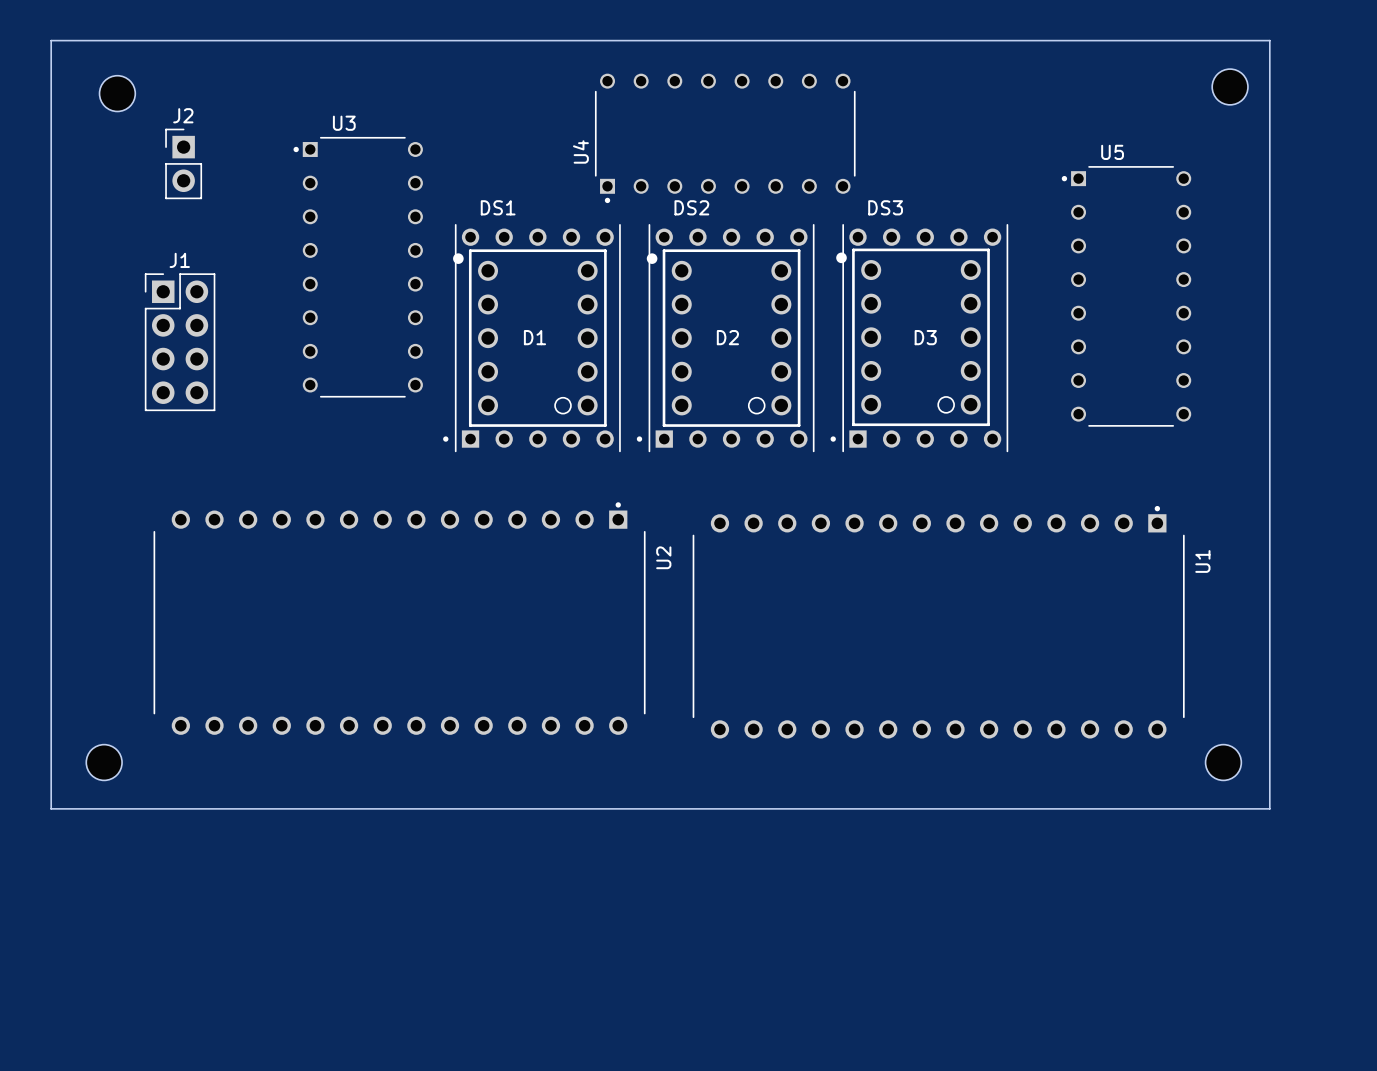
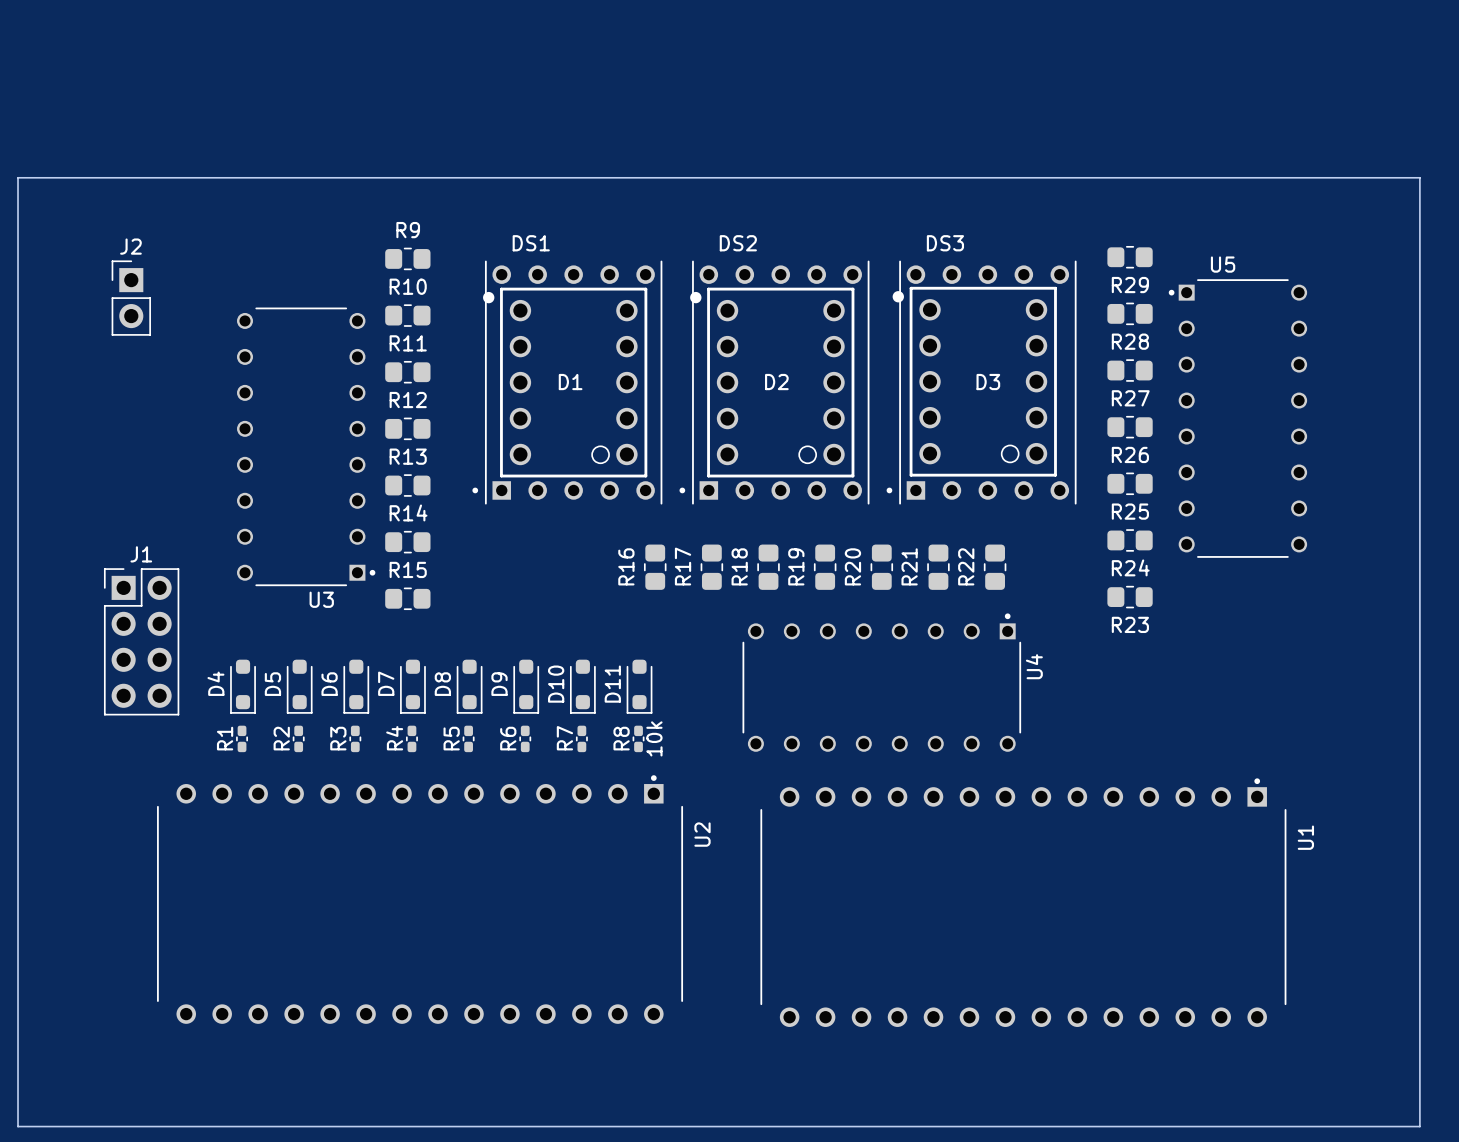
board edge: (51, 40) (1269, 40) (1269, 808) (51, 808) (51, 40) -> (18, 177) (18, 1126) (1419, 1126) (1419, 177) (18, 177)
part: (1230, 86) -> none
part: (117, 93) -> none
U4 rotation: 0° (725, 138) -> 180° (881, 682)
U4 position: (725, 138) -> (881, 682)
J2 position: (183, 163) -> (131, 298)
R29: none -> (1130, 257)
R9: none -> (407, 258)
U3 rotation: 0° (358, 267) -> 180° (306, 446)
R28: none -> (1130, 313)
R10: none -> (407, 315)
U5 position: (1126, 296) -> (1237, 418)
R27: none -> (1130, 370)
R11: none -> (407, 372)
J1 position: (180, 342) -> (141, 641)
R26: none -> (1130, 427)
R12: none -> (407, 428)
R25: none -> (1130, 483)
R13: none -> (407, 485)
R24: none -> (1130, 540)
R14: none -> (407, 542)
R16: none -> (655, 567)
R17: none -> (711, 567)
R18: none -> (768, 567)
R19: none -> (825, 567)
R20: none -> (881, 567)
R21: none -> (938, 567)
R22: none -> (995, 567)
R23: none -> (1130, 597)
R15: none -> (407, 598)
U2 position: (399, 618) -> (420, 899)
D4: none -> (243, 686)
D5: none -> (299, 686)
D6: none -> (356, 686)
D7: none -> (412, 686)
D8: none -> (469, 686)
D9: none -> (526, 686)
D10: none -> (582, 686)
D11: none -> (639, 686)
U1 position: (938, 622) -> (1023, 902)
R1: none -> (242, 738)
R2: none -> (298, 738)
R3: none -> (355, 738)
R4: none -> (411, 738)
R5: none -> (468, 738)
R6: none -> (525, 738)
R7: none -> (581, 738)
R8: none -> 10k (638, 738)
part: (104, 762) -> none
part: (1223, 762) -> none

